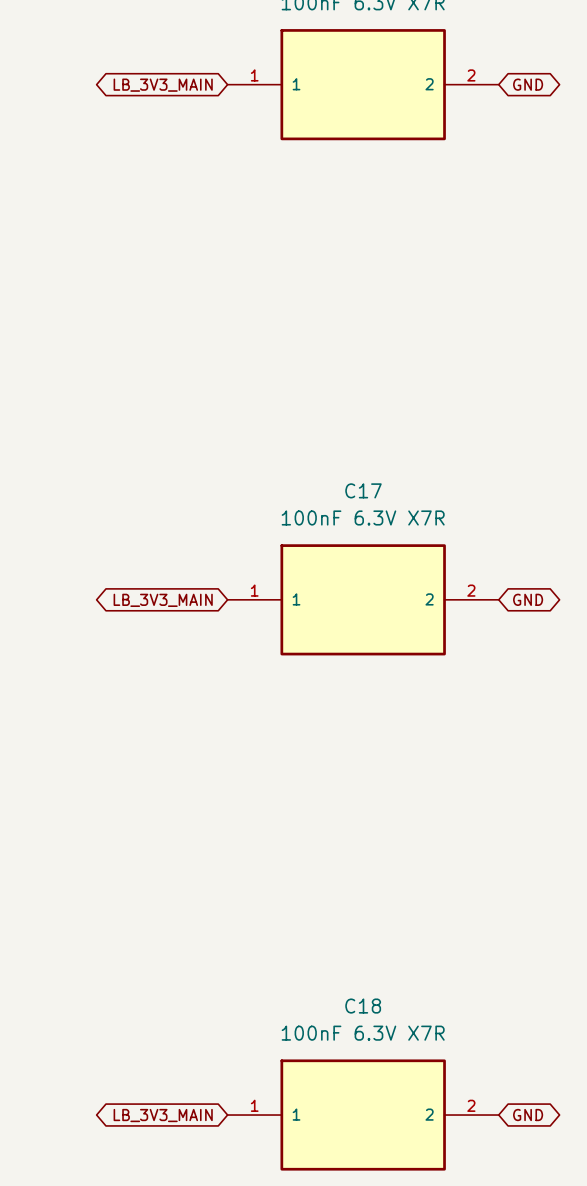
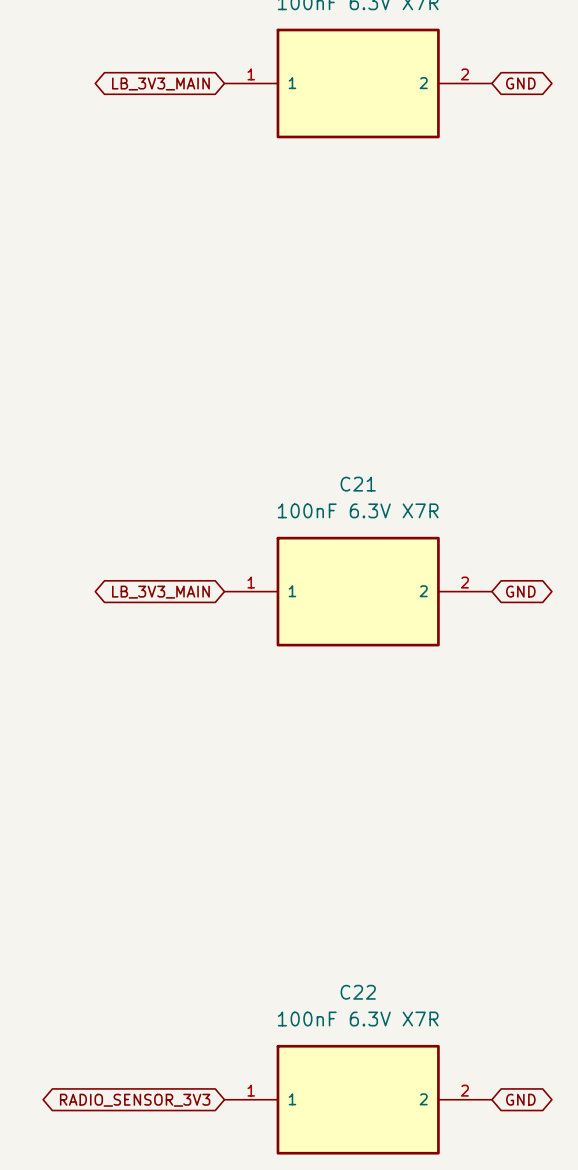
C17 name: C17 (363, 490) -> C21 (358, 484)
C18 name: C18 (363, 1006) -> C22 (358, 992)
global label: LB_3V3_MAIN (163, 1115) -> RADIO_SENSOR_3V3 (135, 1100)

